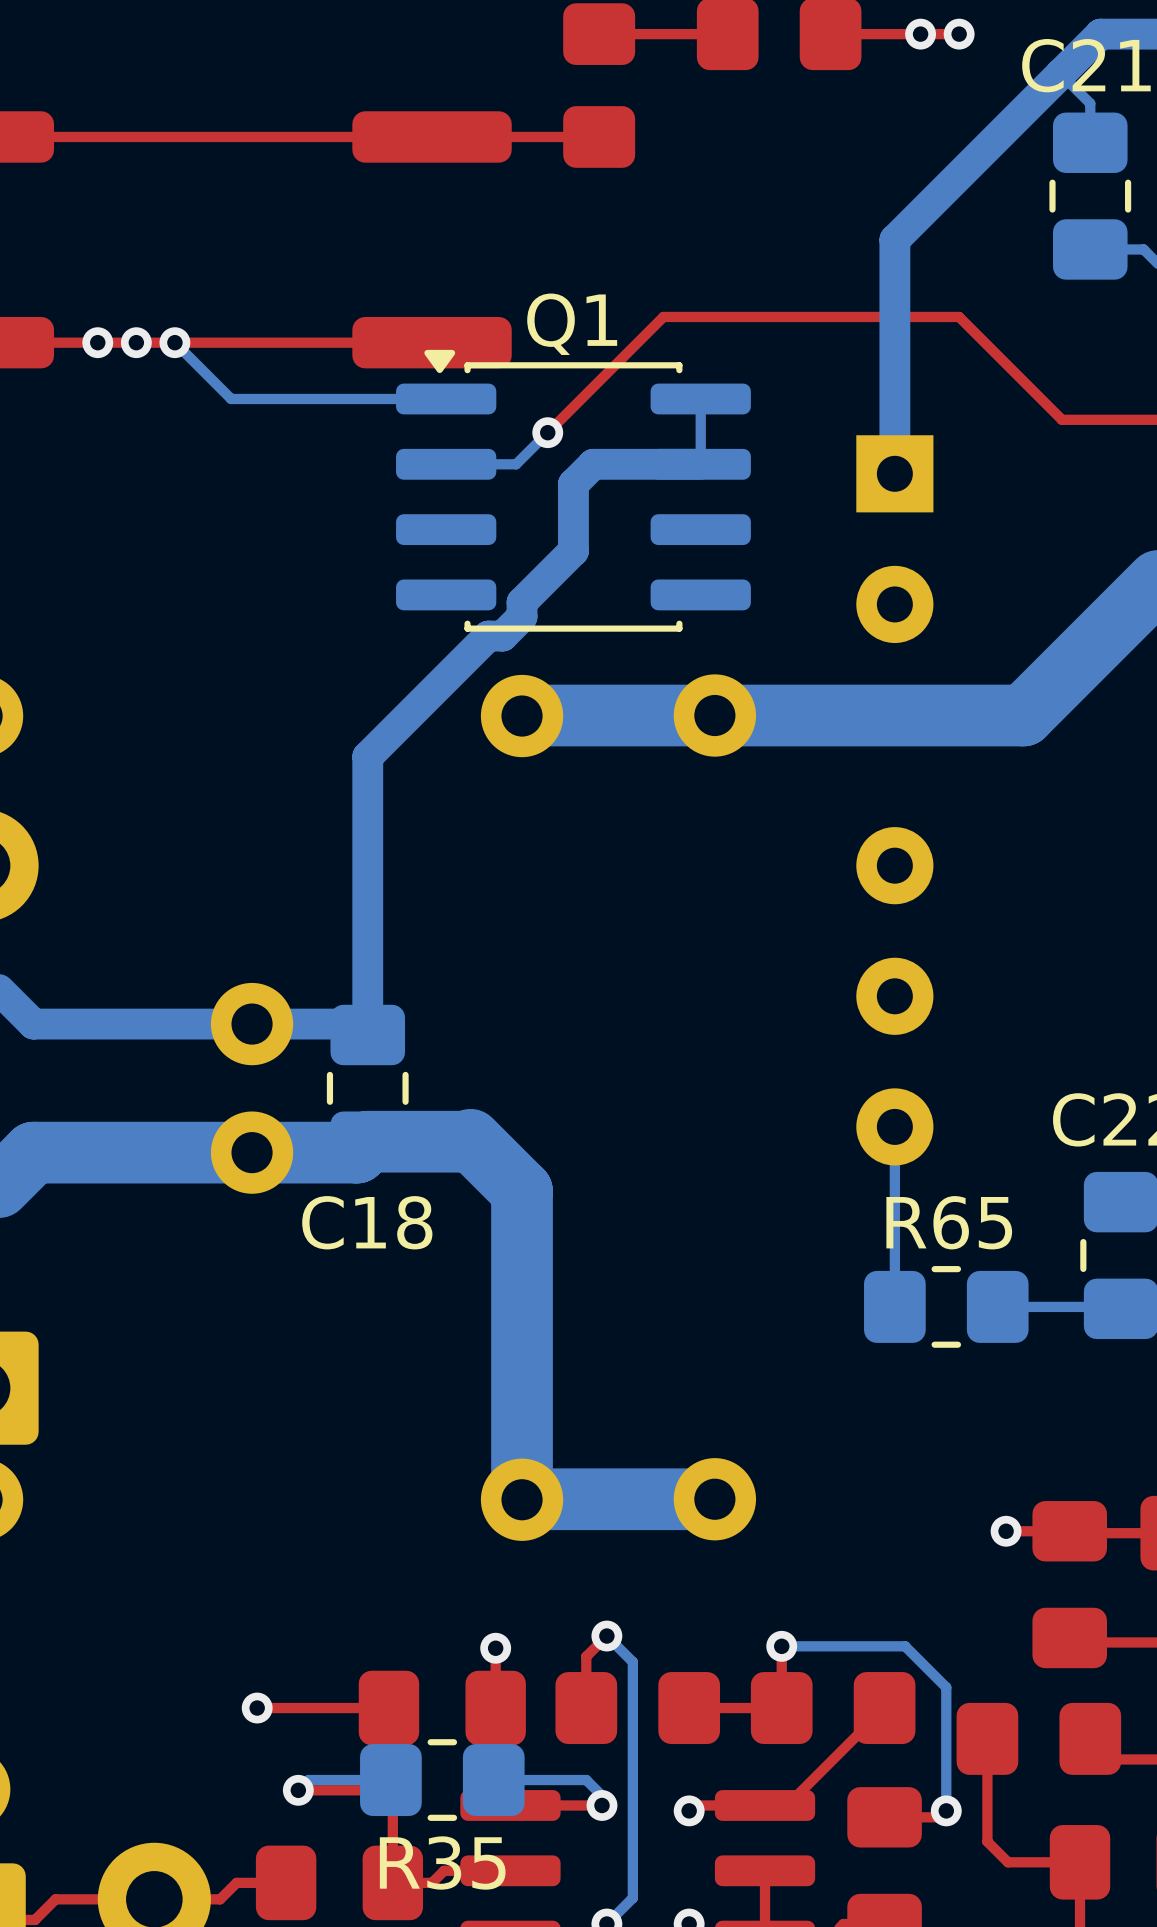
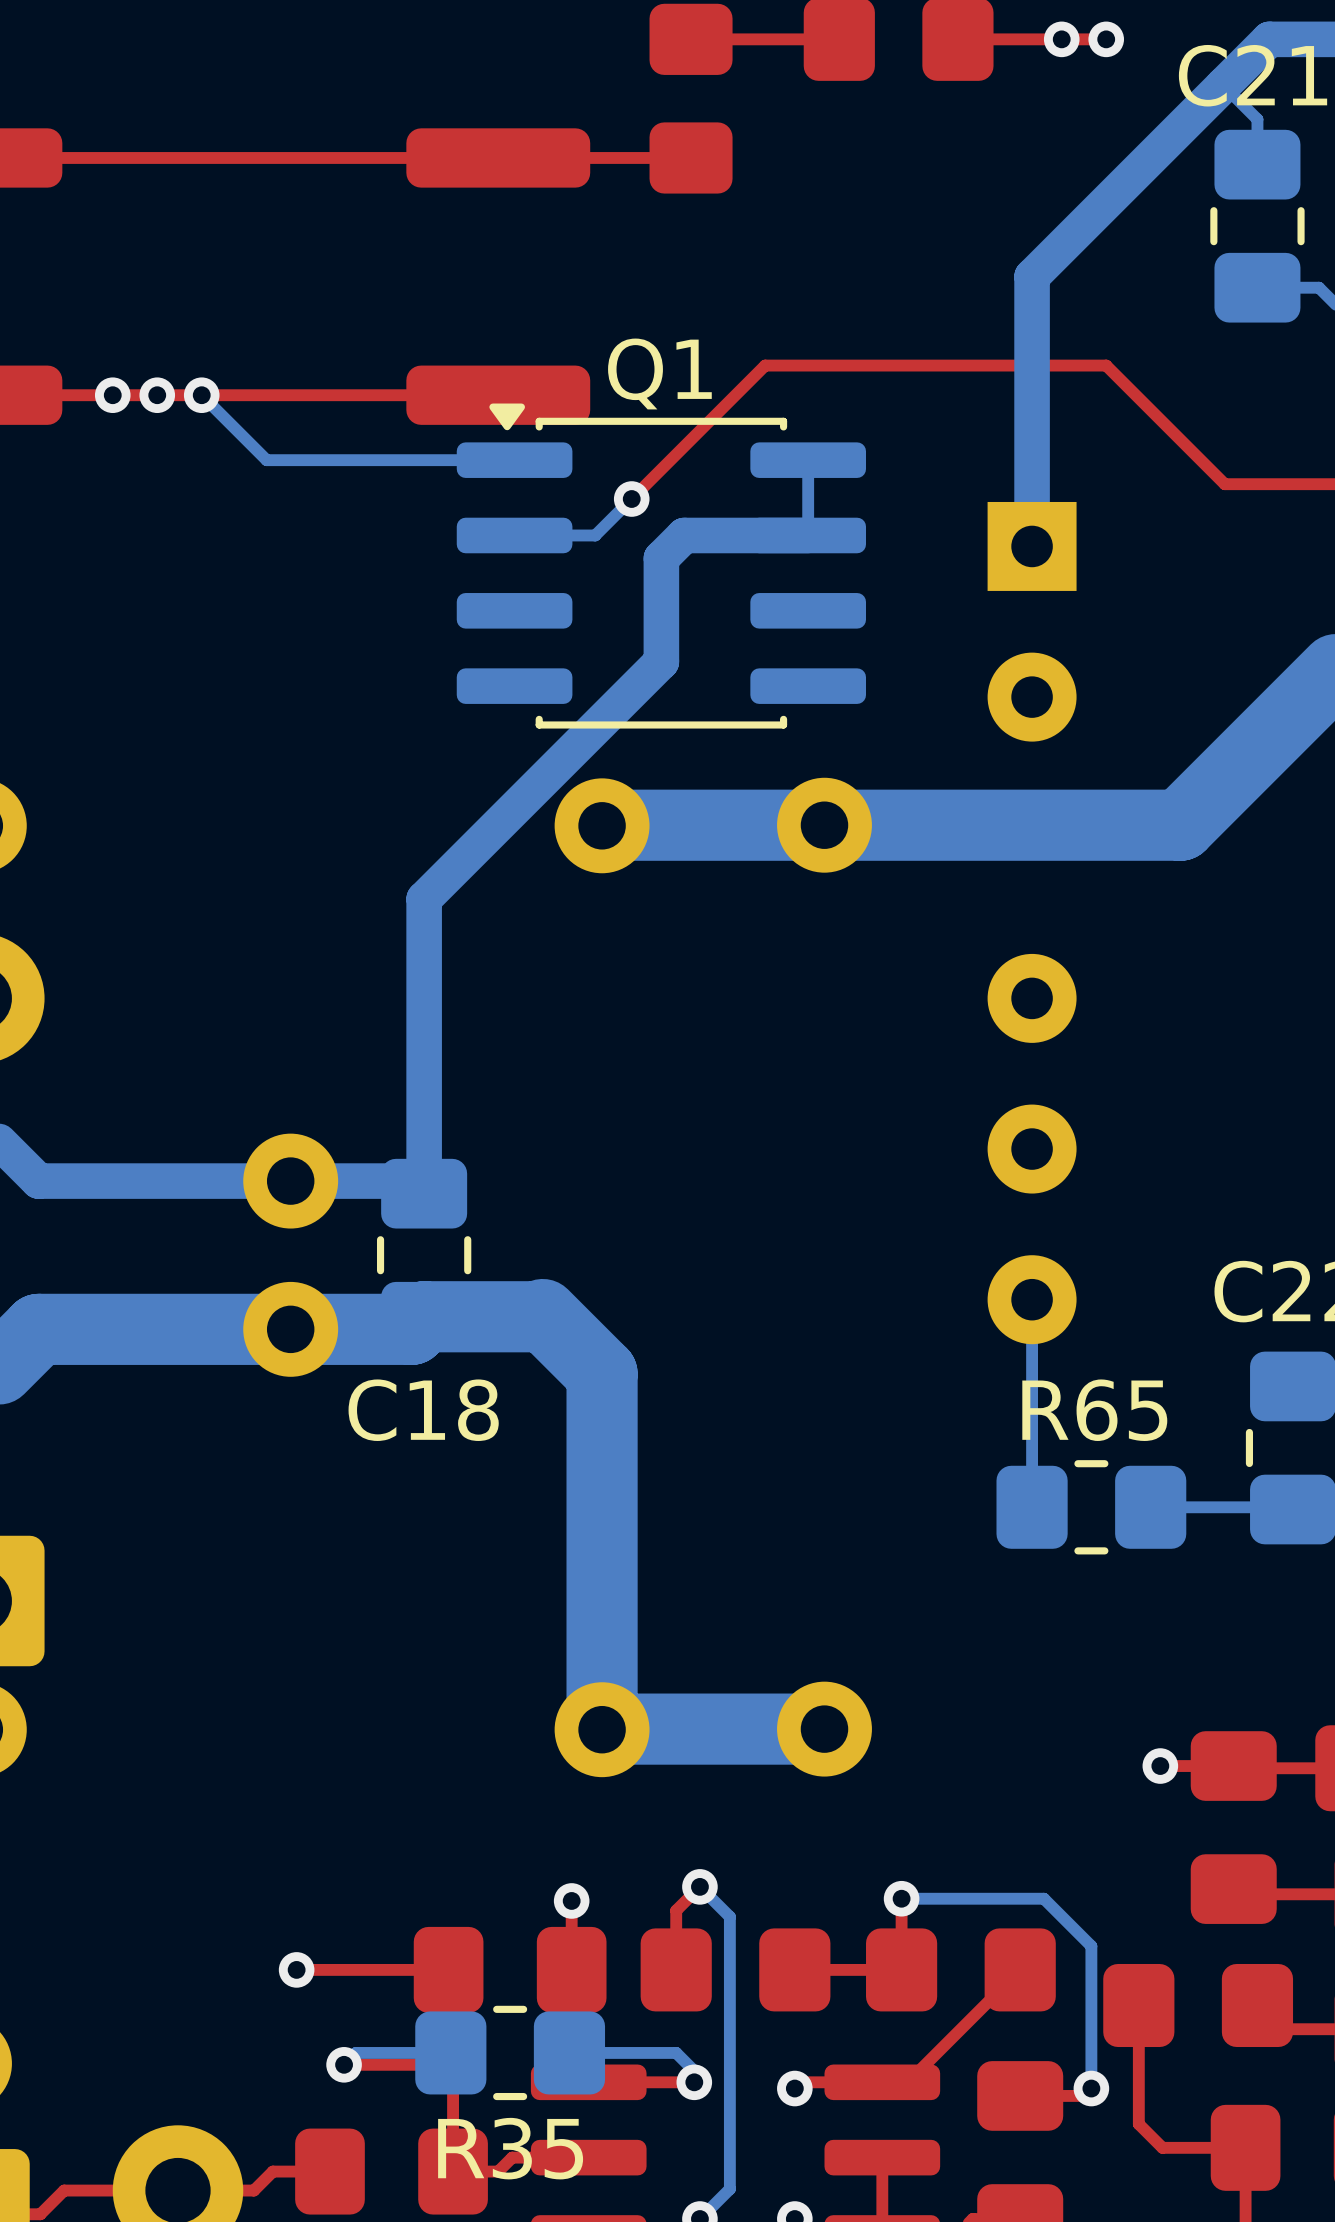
bottom track: (573, 550) (522, 602) (522, 616) (502, 636) (488, 636) (367, 756) (367, 779) -> (661, 635) (661, 661) (424, 899)

